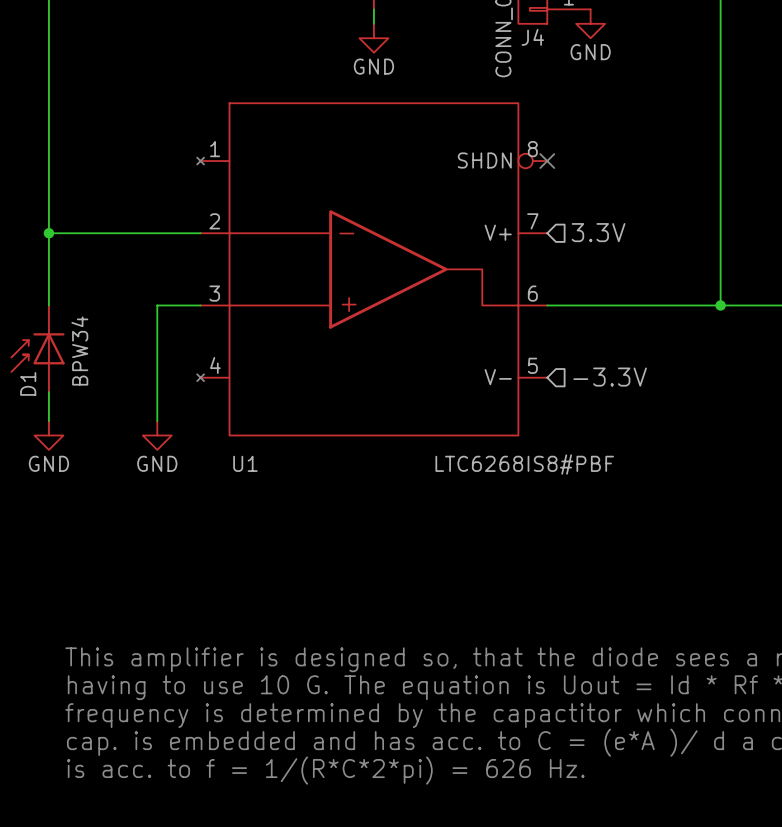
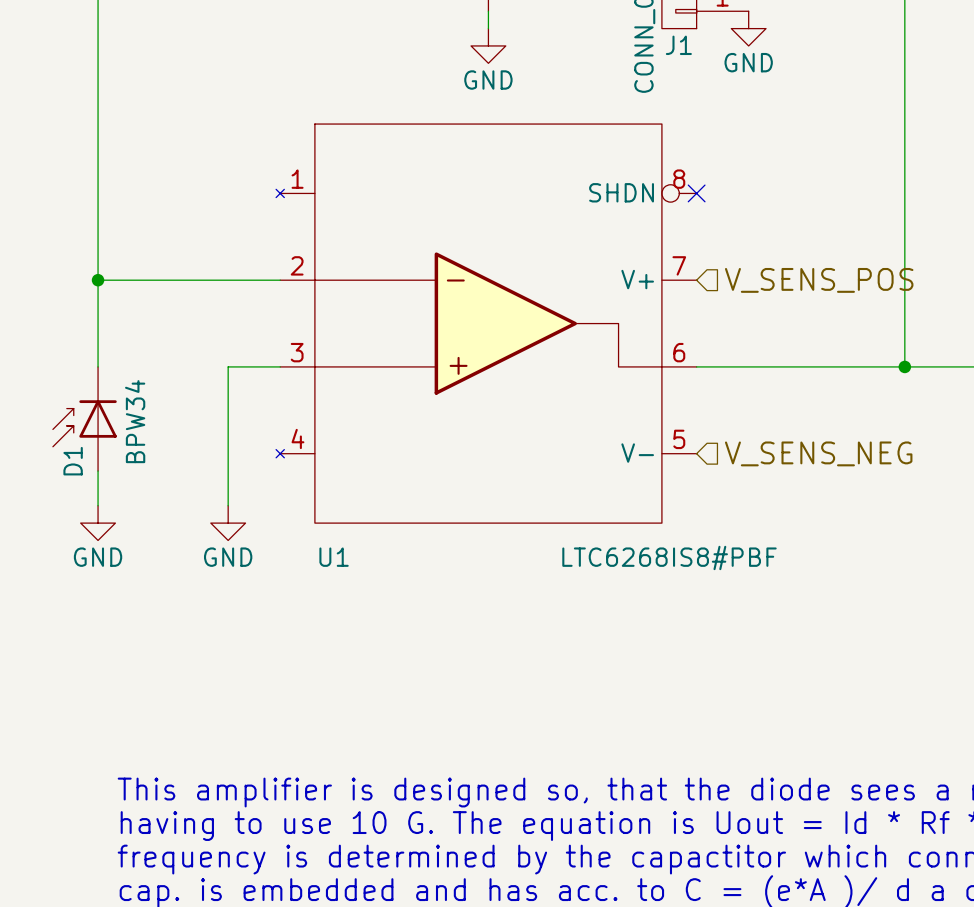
J4 name: J4 (532, 37) -> J1 (678, 45)
hierarchical label: 3.3V (598, 232) -> V_SENS_POS (819, 280)
hierarchical label: -3.3V (610, 377) -> V_SENS_NEG (818, 453)

